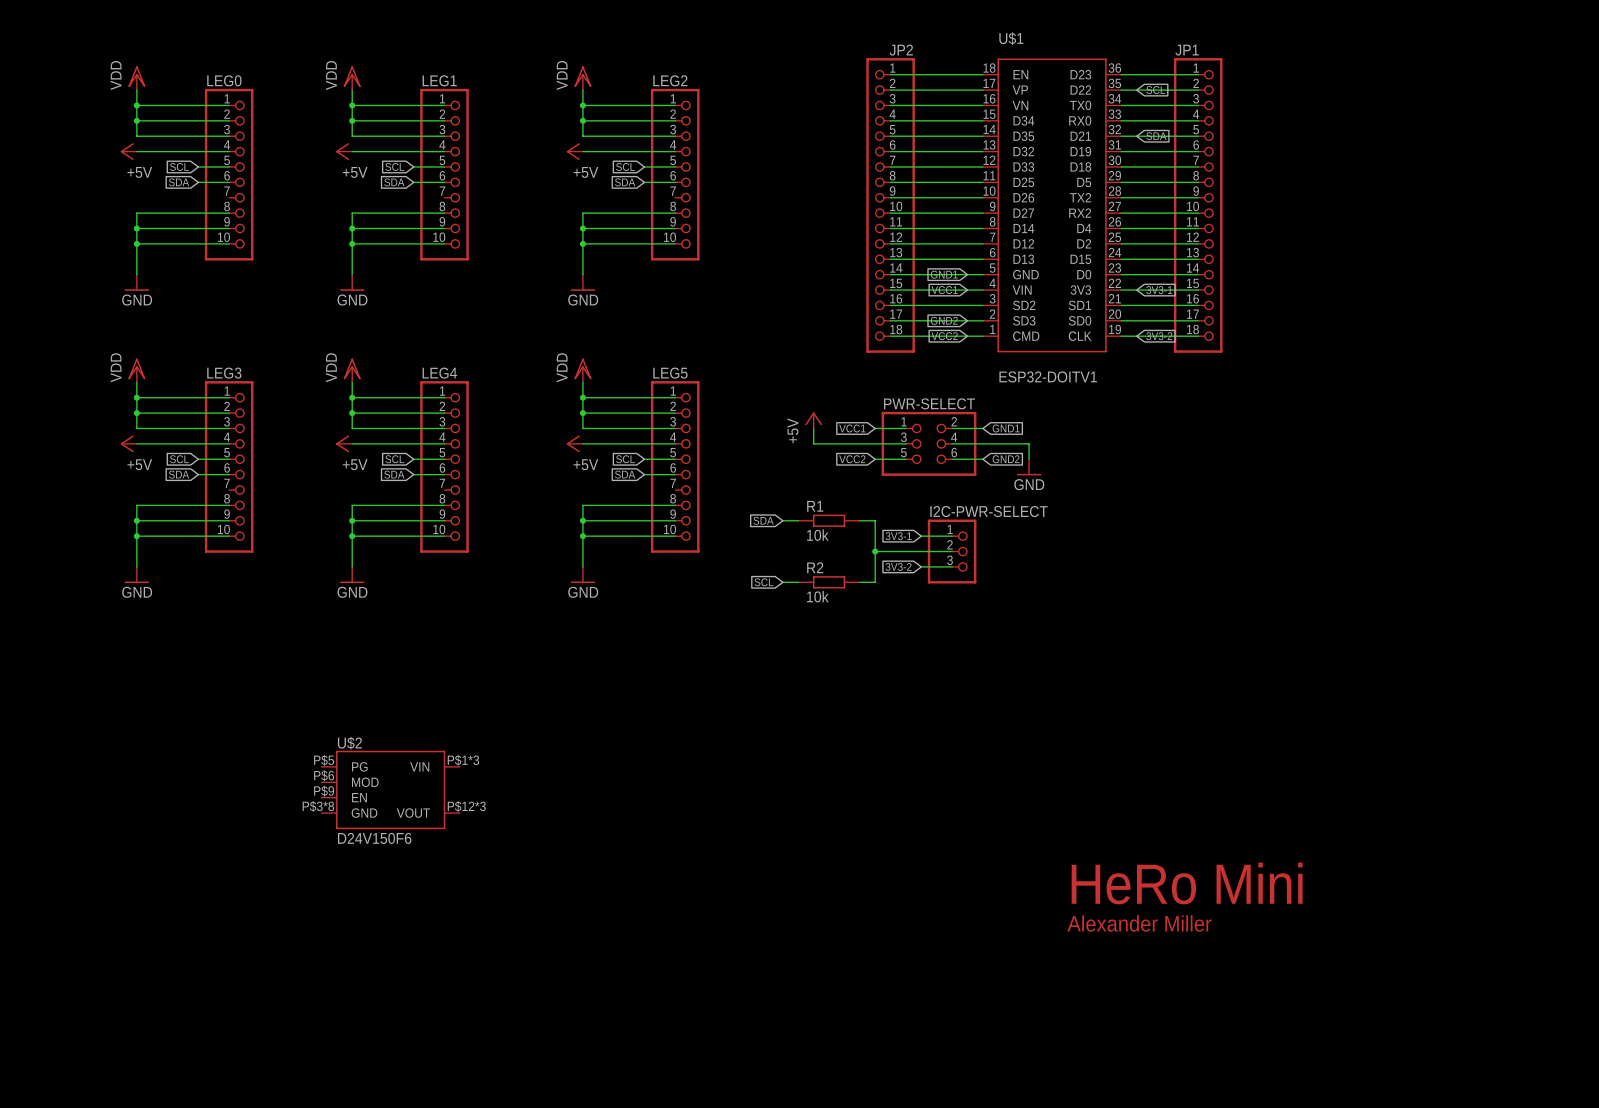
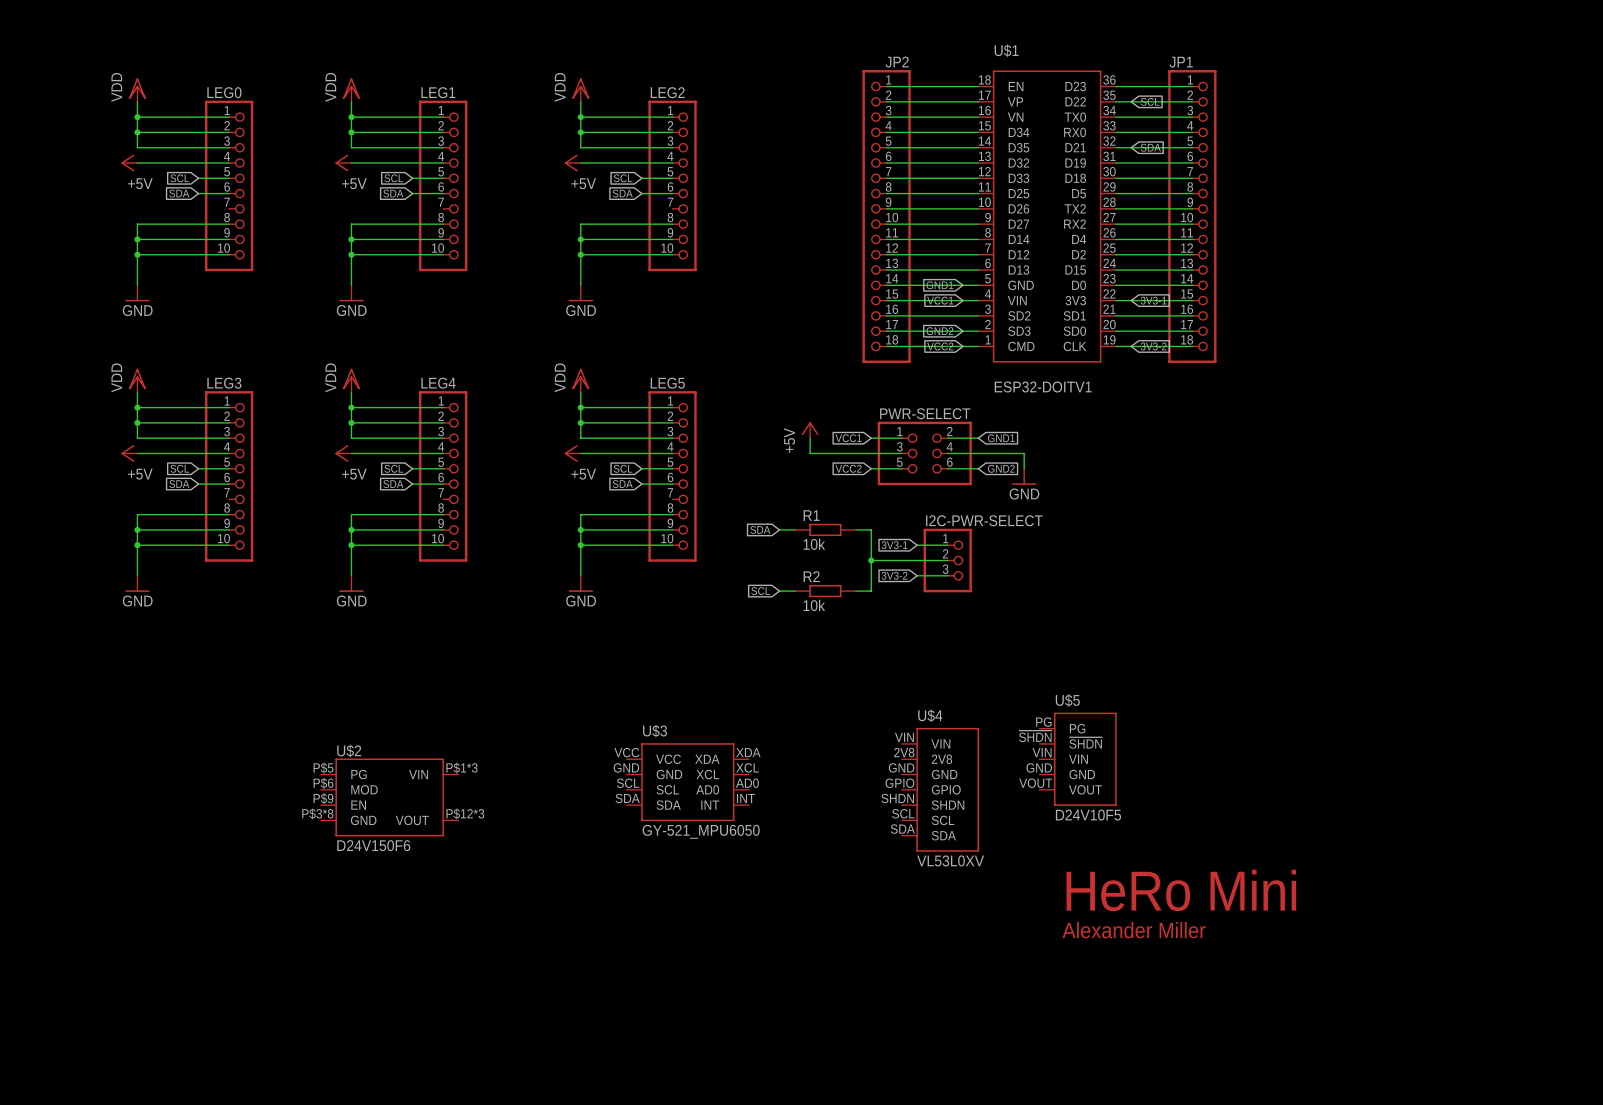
U$5: none -> D24V10F5 (1078, 759)
U$3: none -> GY-521_MPU6050 (687, 782)
U$4: none -> VL53L0XV (940, 789)

